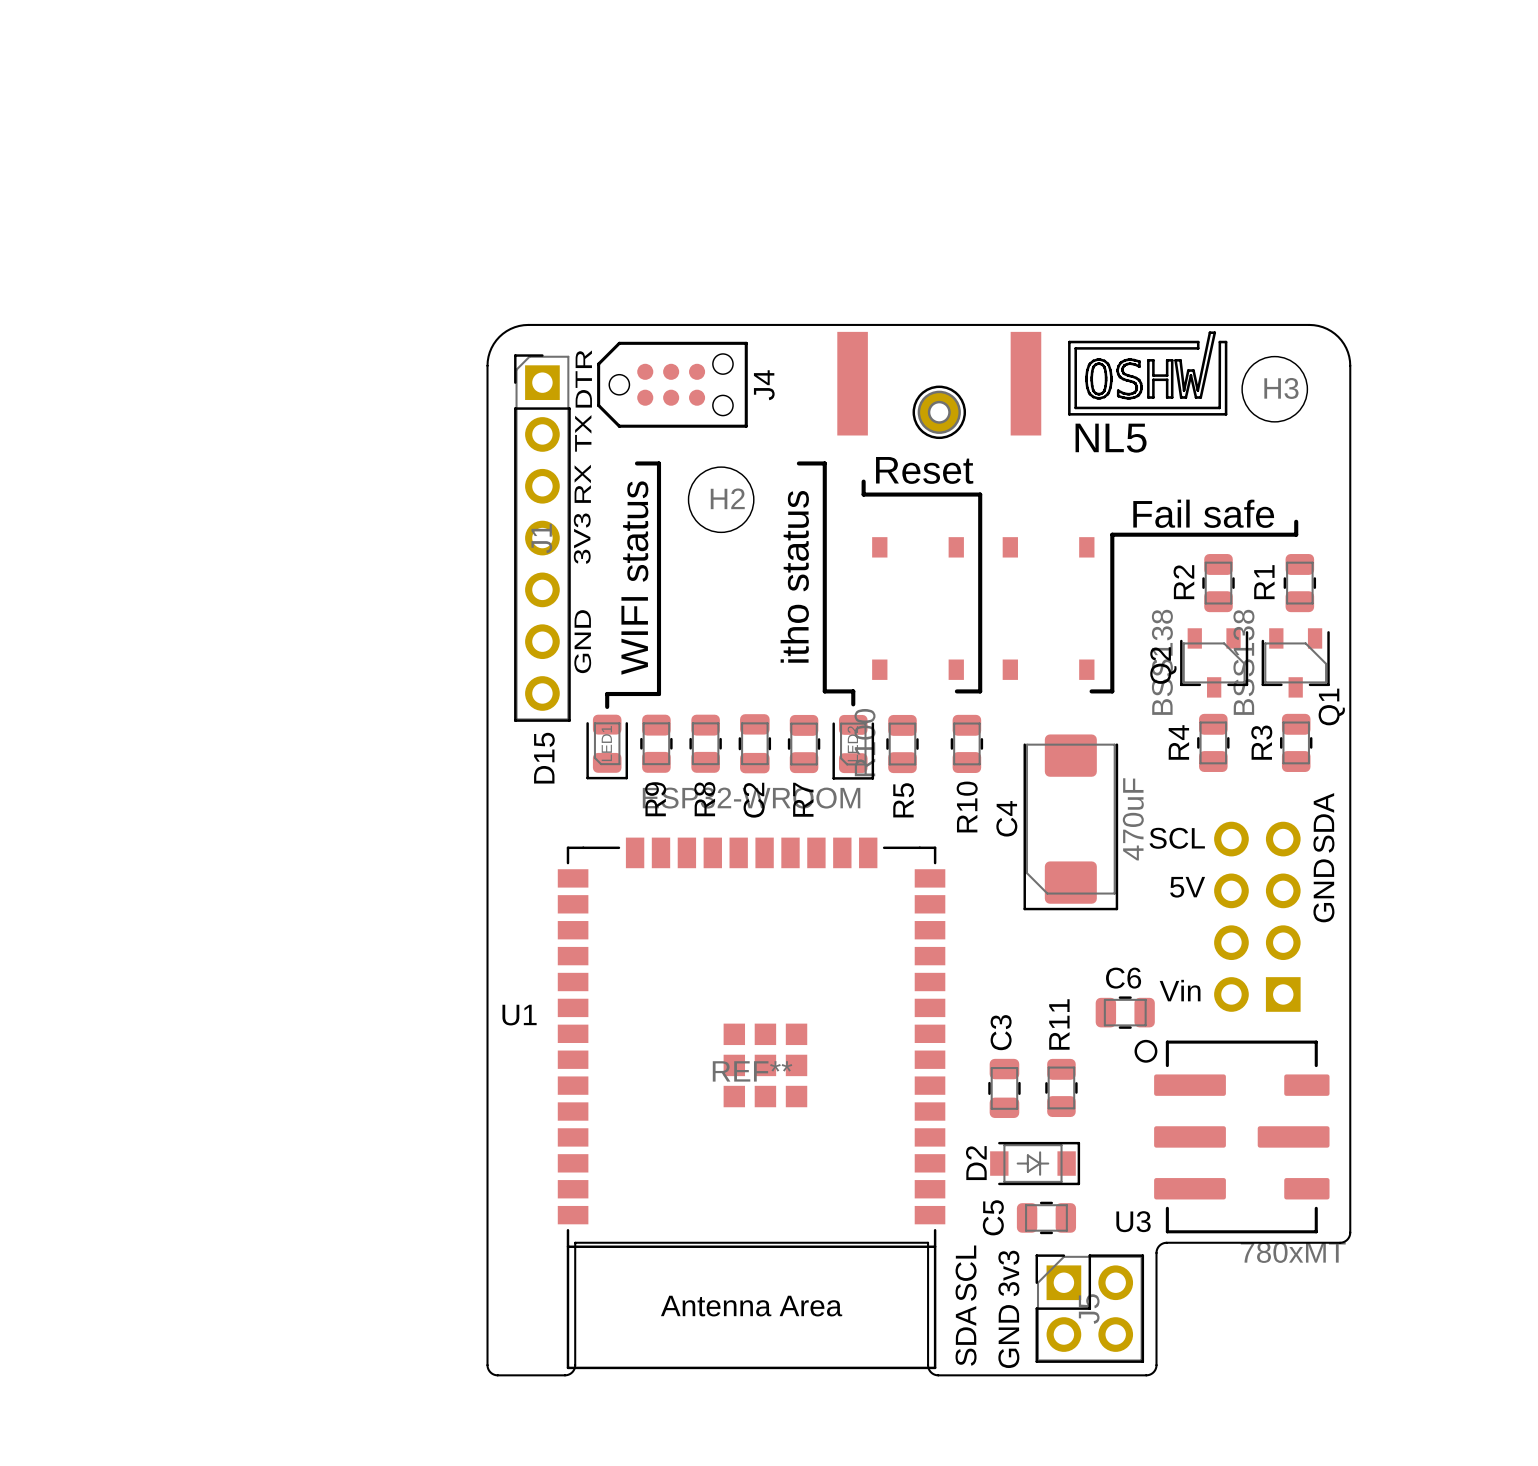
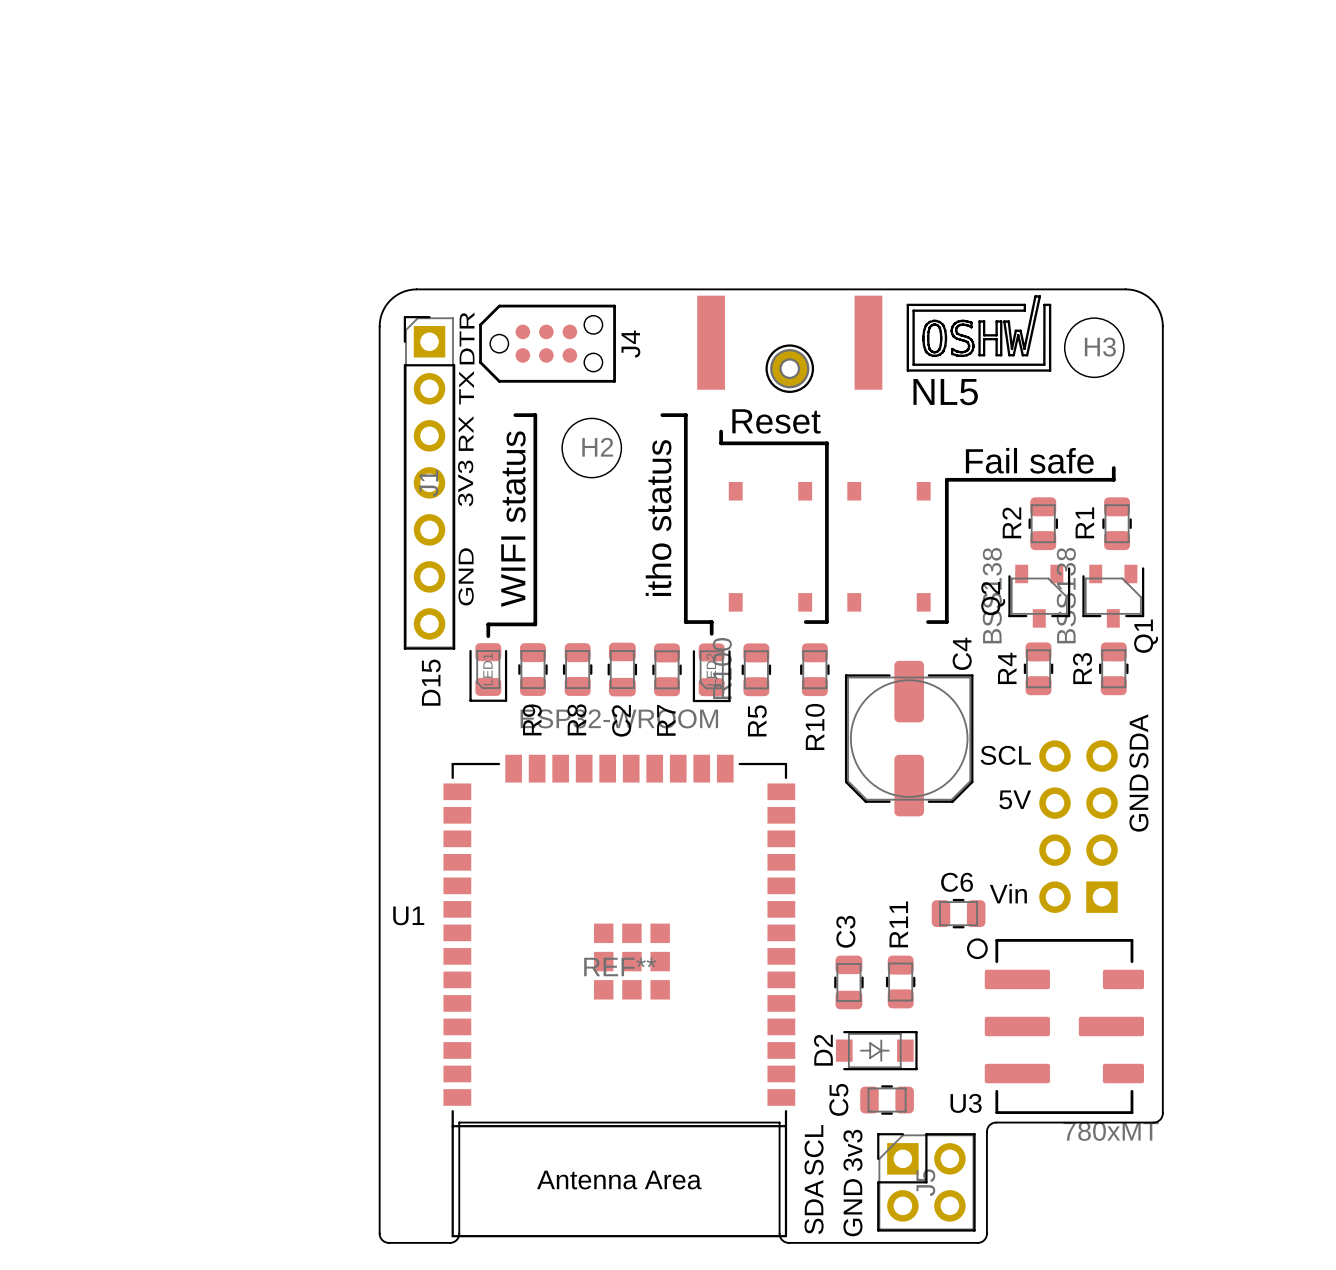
C4 footprint: [1023, 734, 1119, 911] -> [844, 660, 974, 817]
C4 name position: C4 (1006, 818) -> C4 (962, 653)
C4 value: 470uF (1133, 819) -> none

